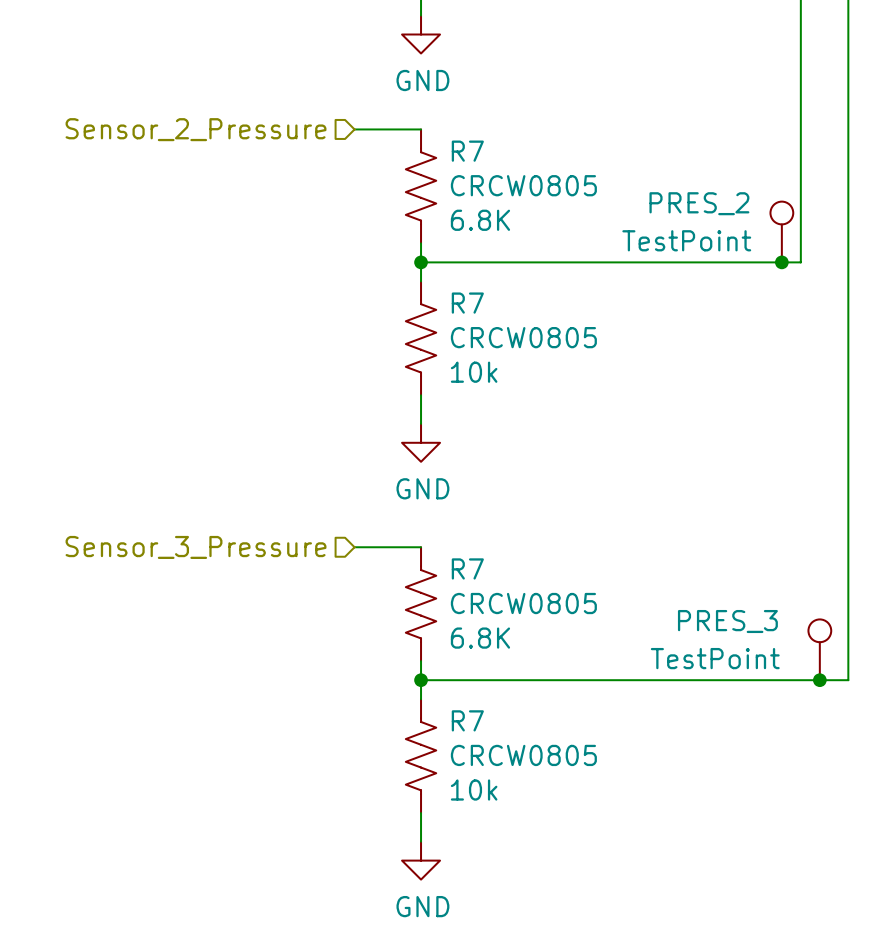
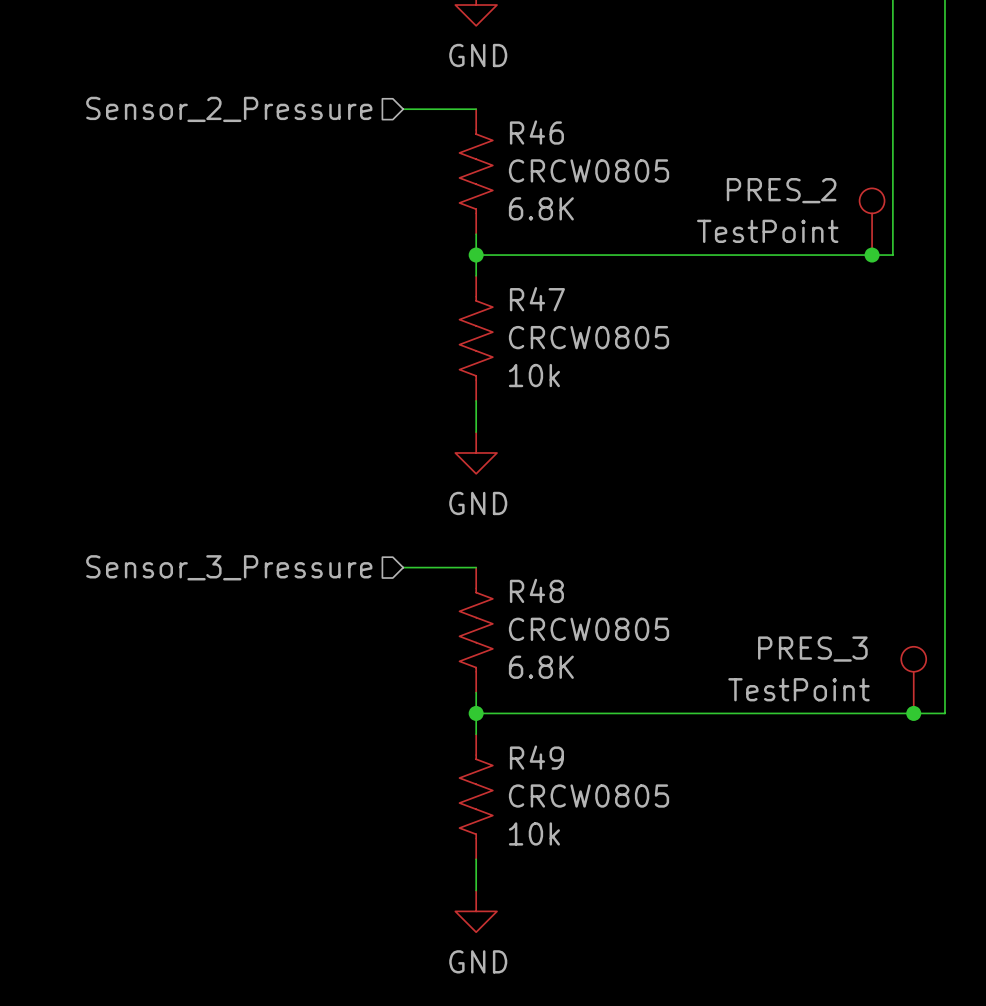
R7 name: R7 (467, 151) -> R46 (536, 132)
R7 name: R7 (467, 303) -> R47 (537, 299)
R7 name: R7 (467, 568) -> R48 (536, 590)
R7 name: R7 (467, 720) -> R49 (536, 757)

